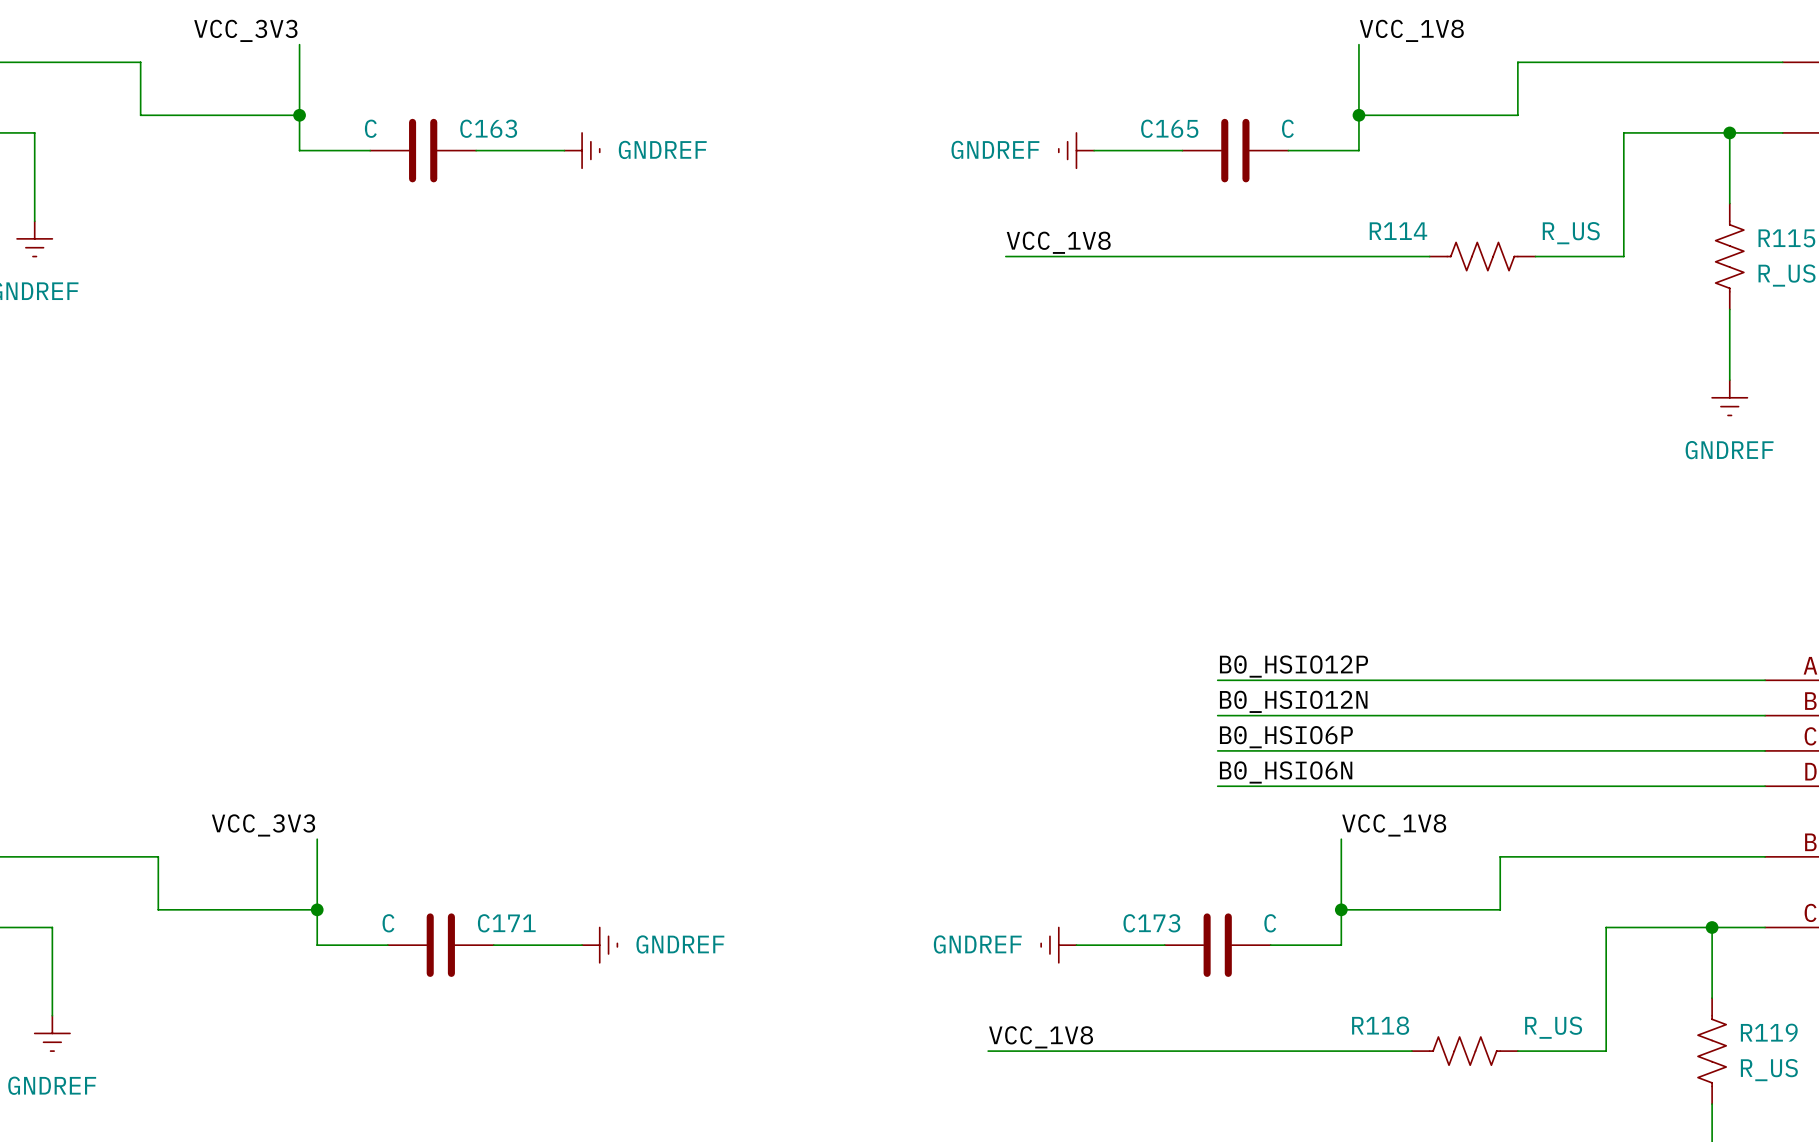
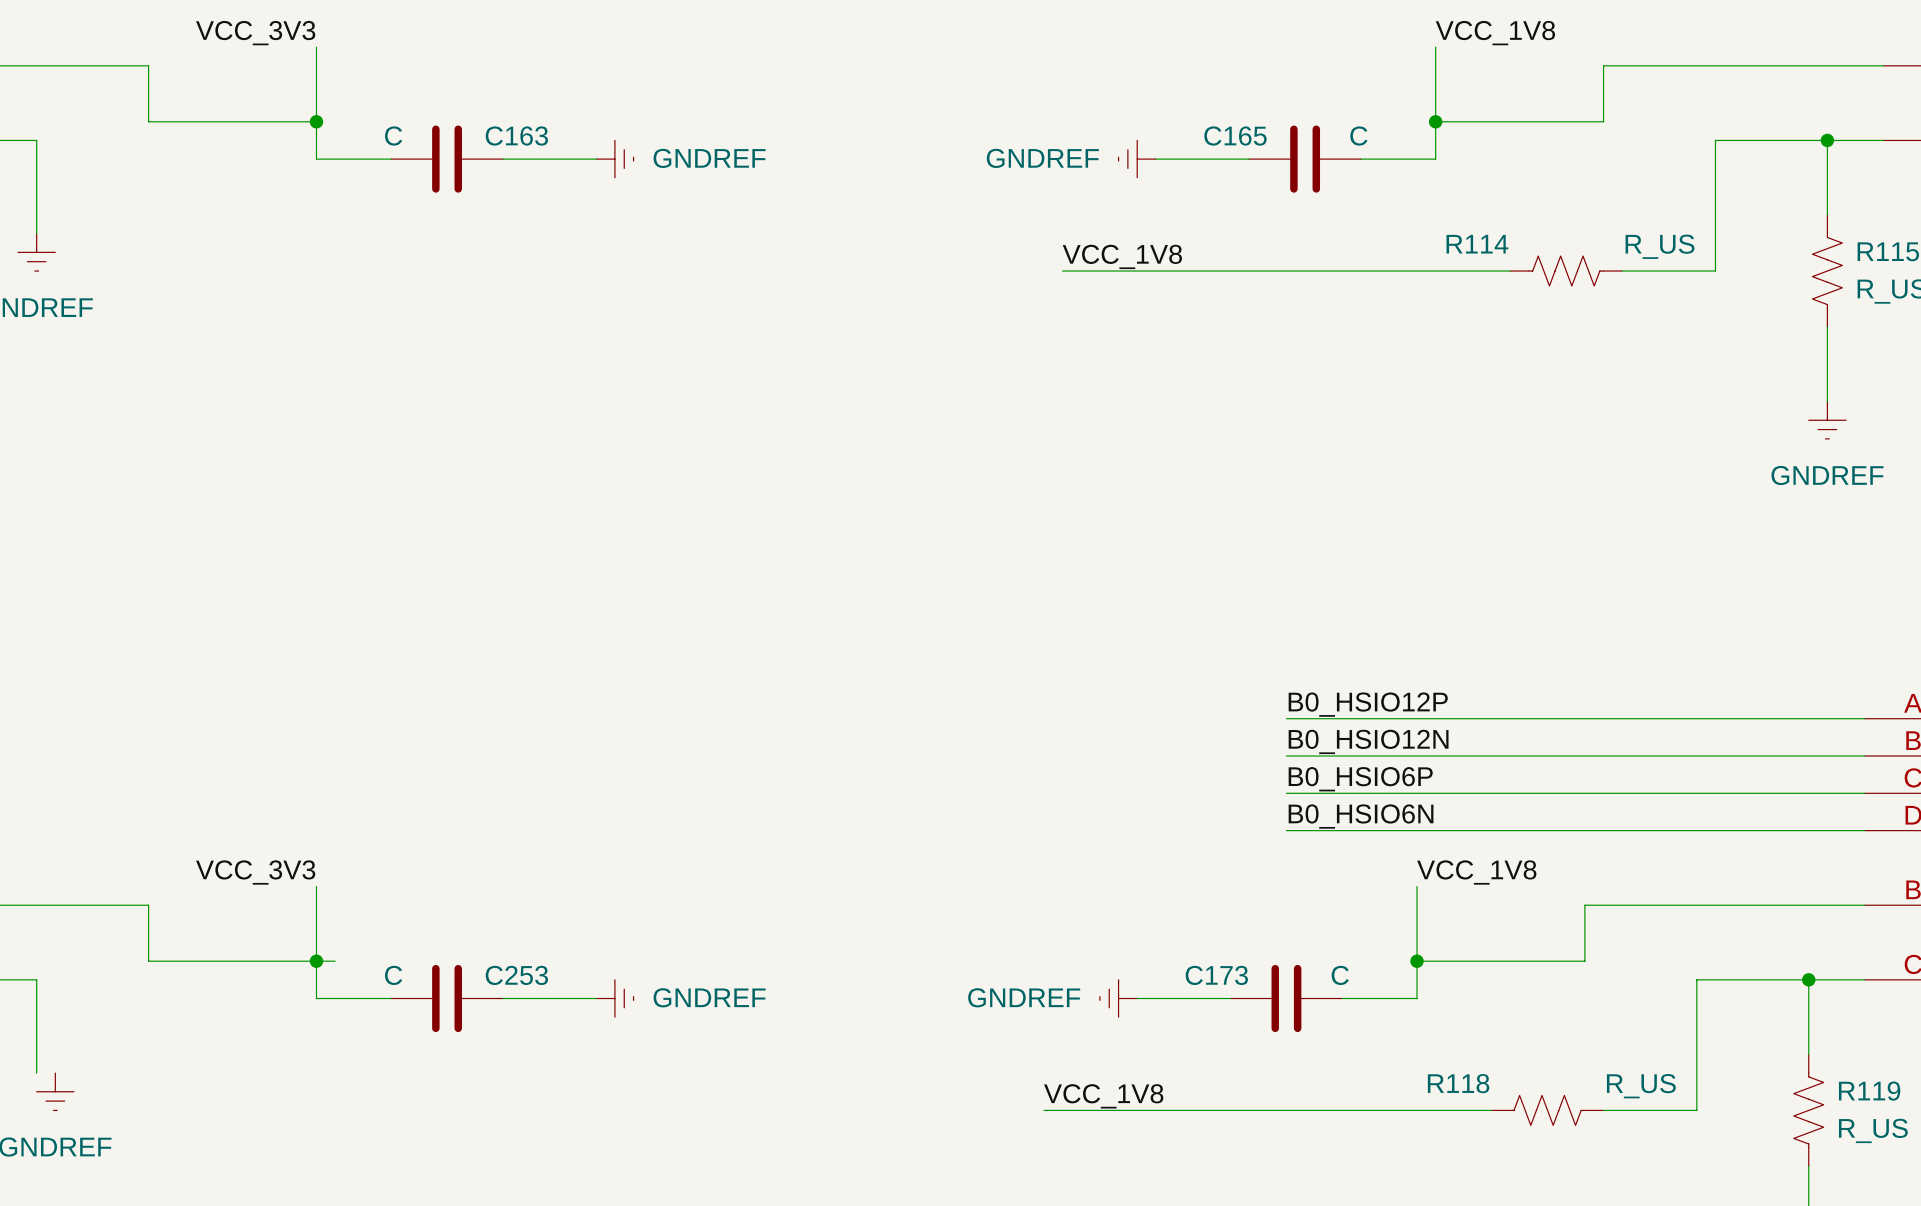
label position: VCC_3V3 (263, 825) -> VCC_3V3 (255, 872)
wire: (317, 839) (317, 945) -> (316, 886) (316, 998) (335, 998)
wire: (140, 856) (158, 856) (158, 909) -> (148, 905) (148, 961) (167, 961)
junction position: (317, 909) -> (316, 961)
wire: (34, 927) (52, 927) (52, 1015) -> (36, 979) (36, 1073)
C253: none -> C (447, 998)
C171: C (440, 945) -> none
power symbol position: GNDREF (599, 945) -> GNDREF (614, 998)

